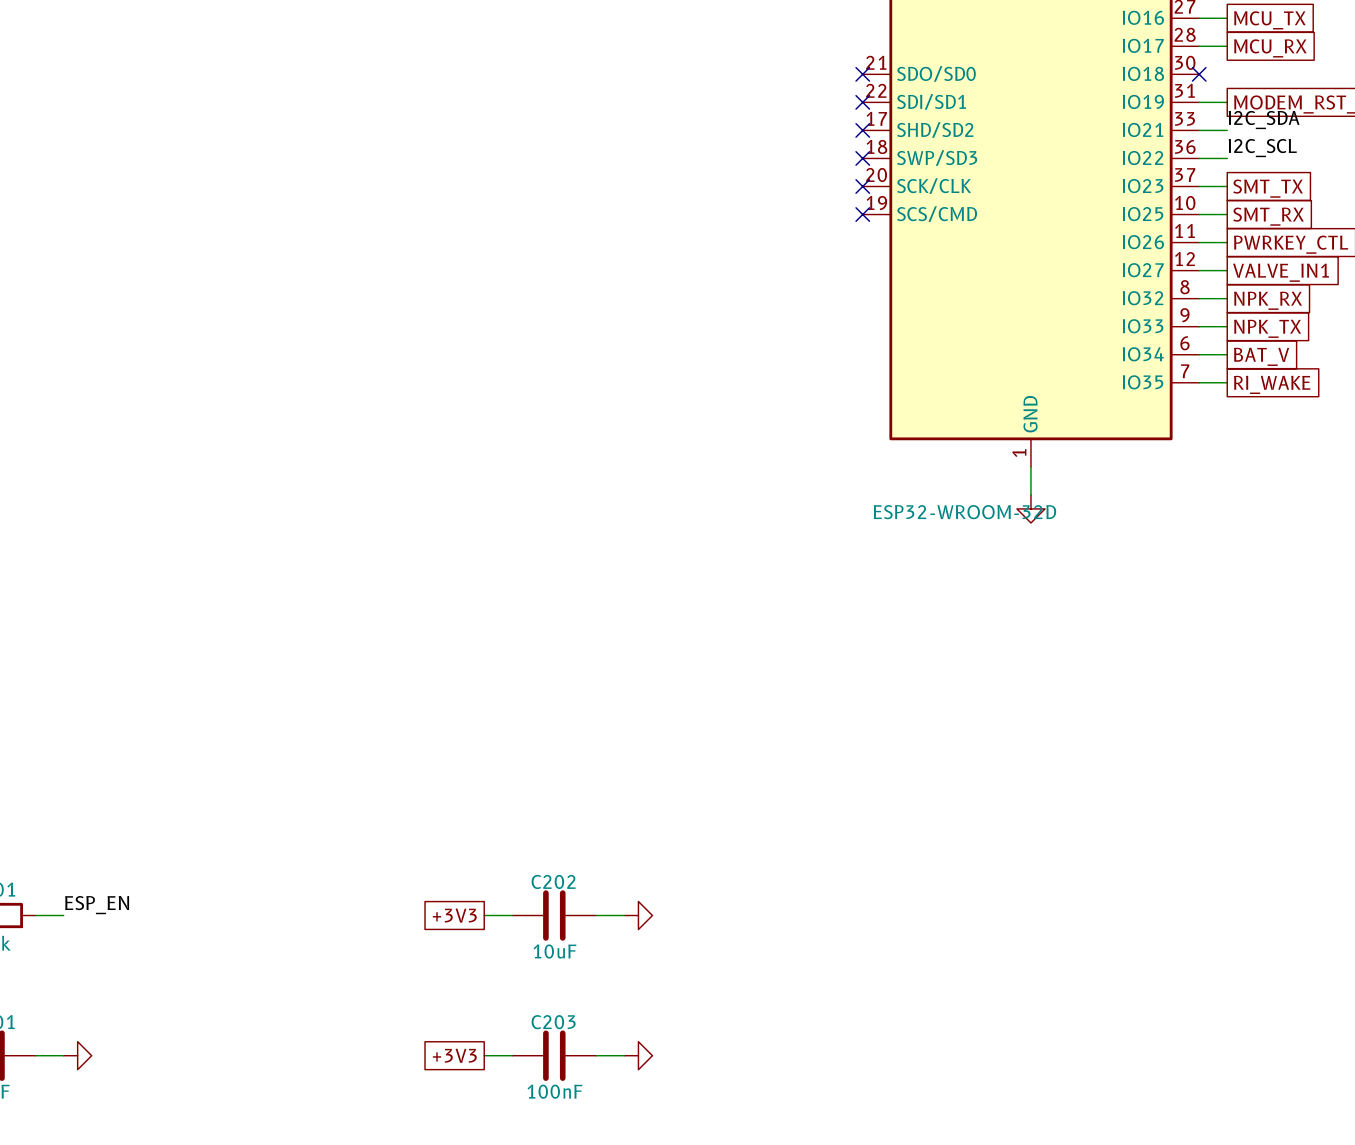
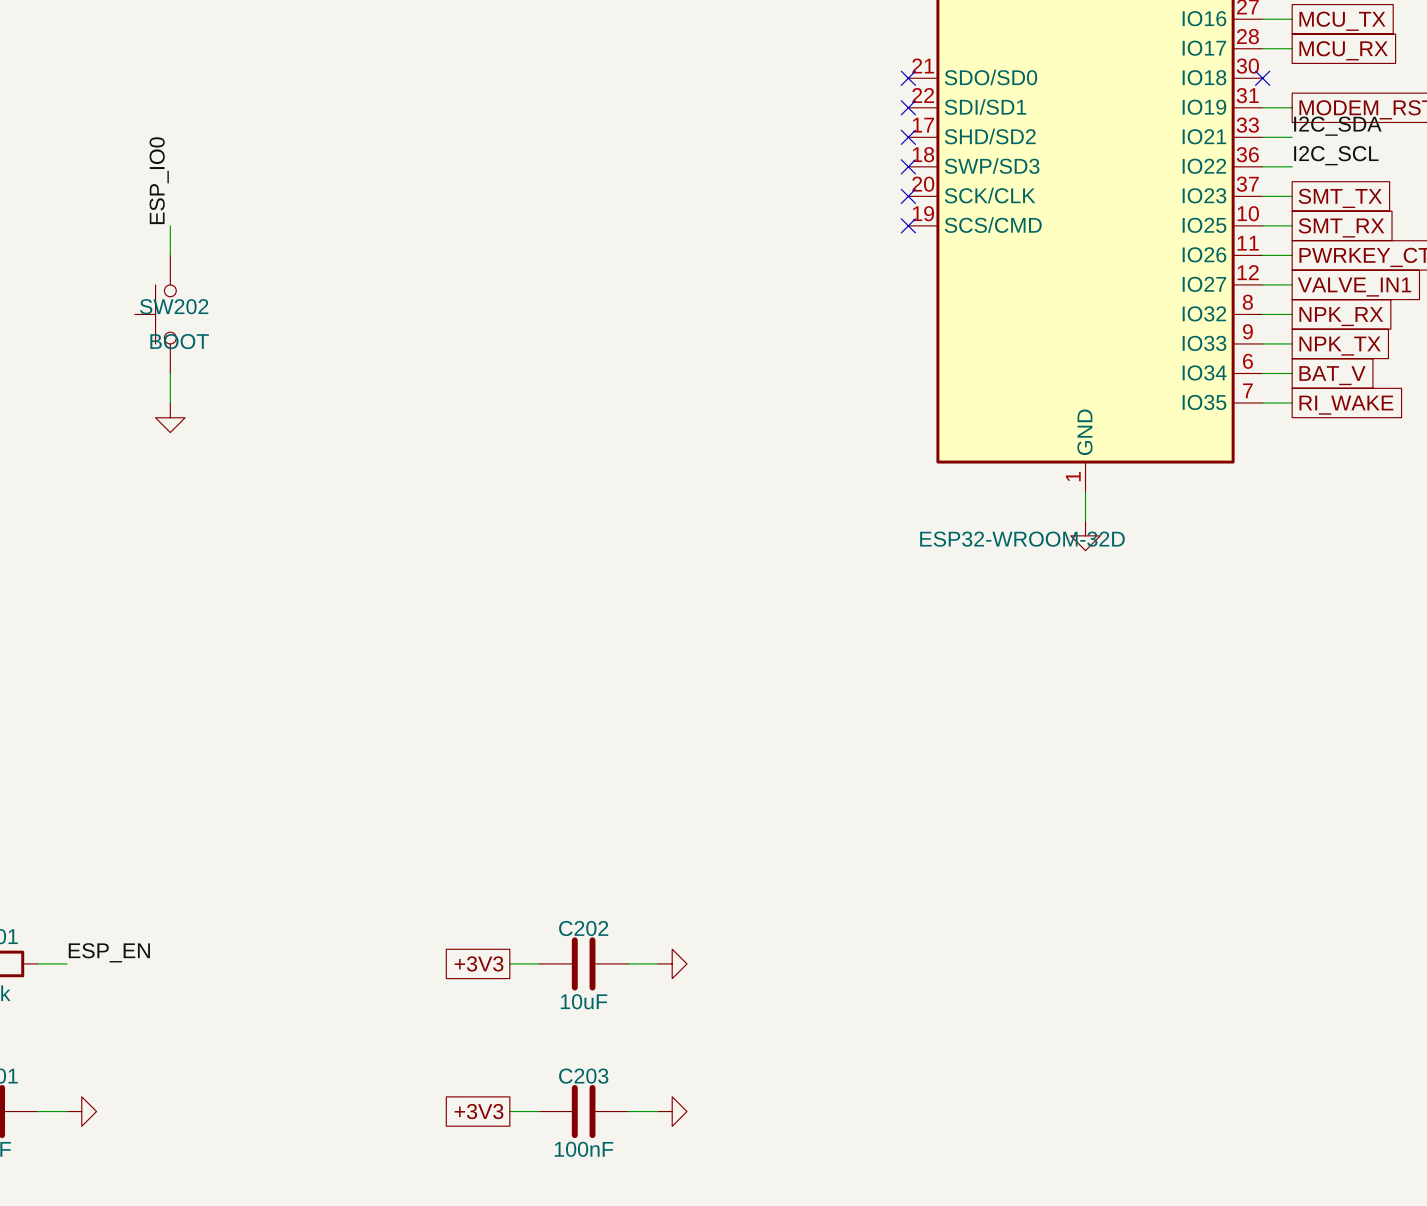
label: none -> ESP_IO0 (159, 180)
wire: none -> (170, 225) (170, 255)
SW202: none -> BOOT (155, 314)
wire: none -> (170, 373) (170, 403)
power symbol: none -> (170, 417)

